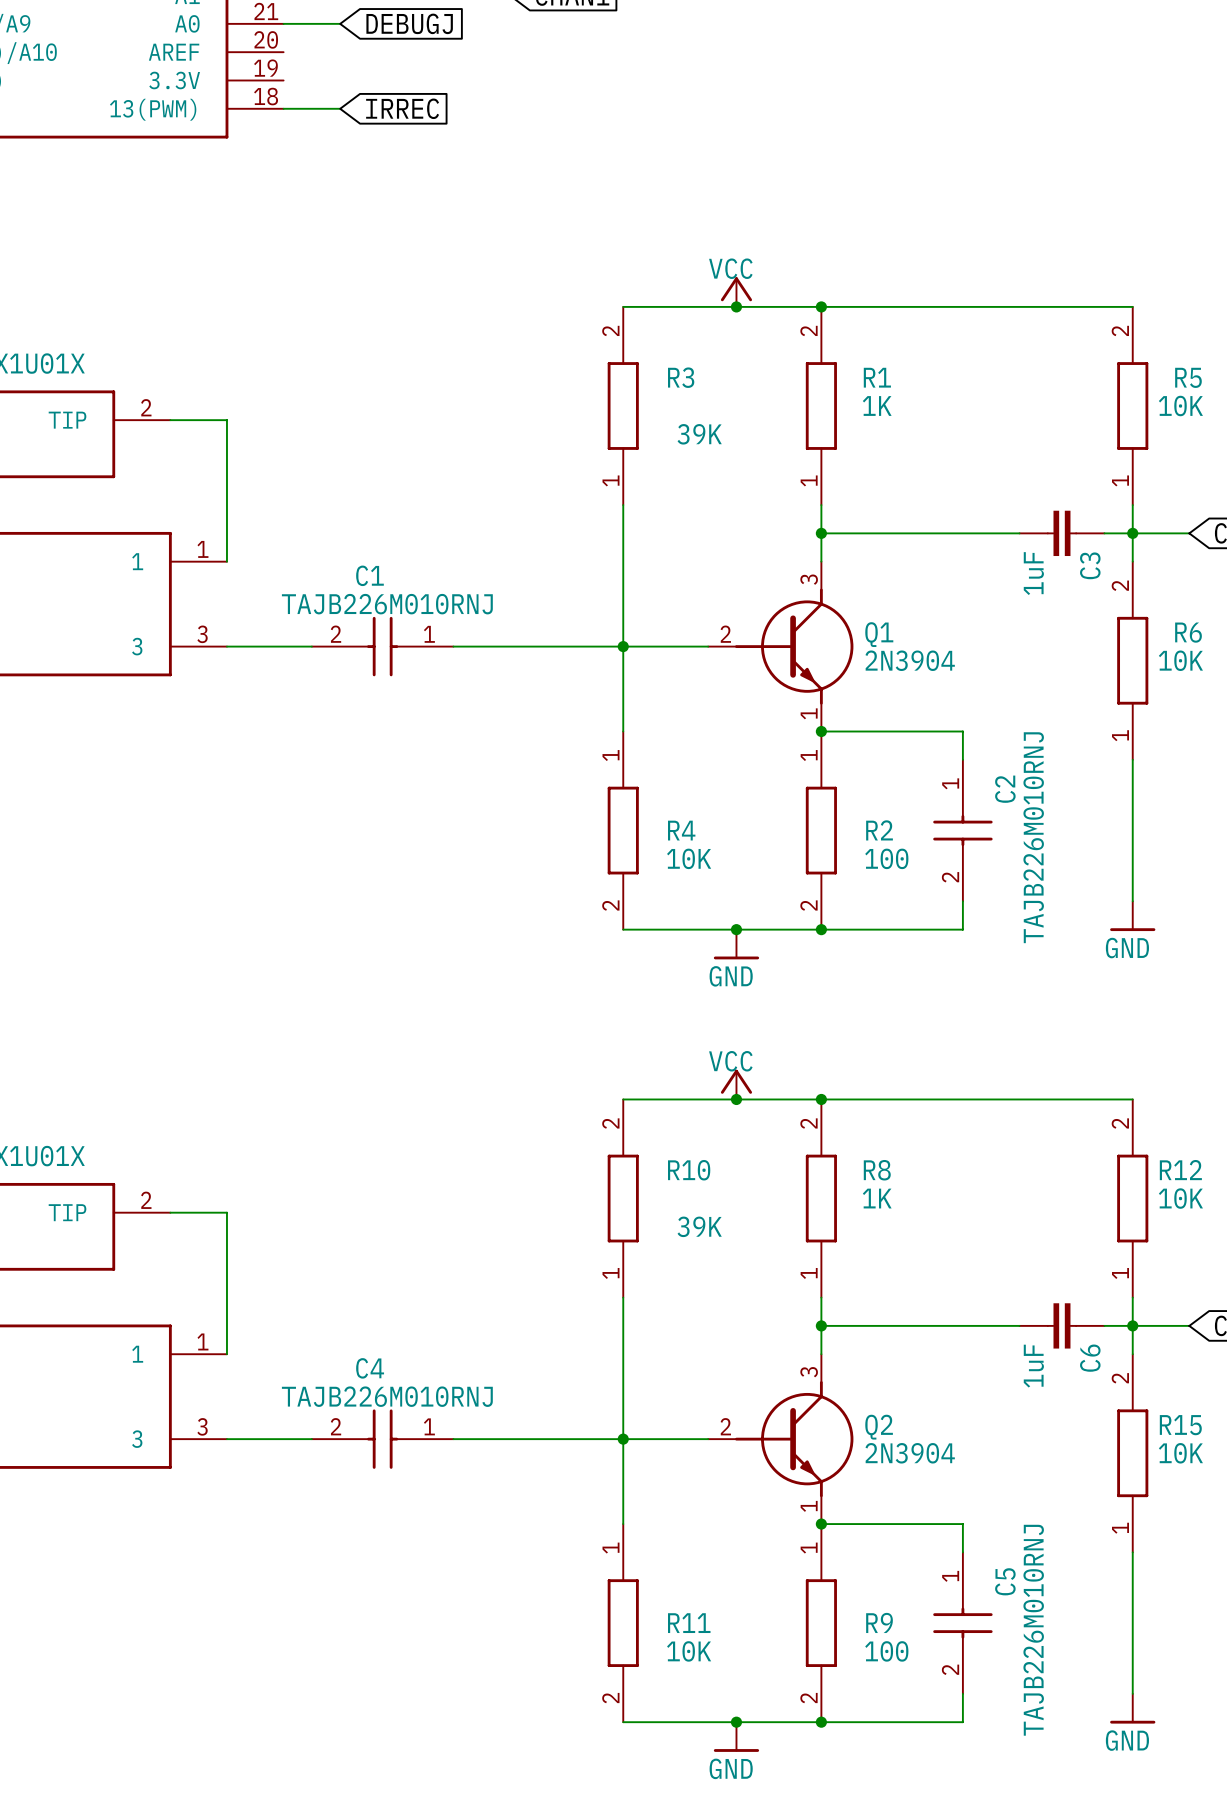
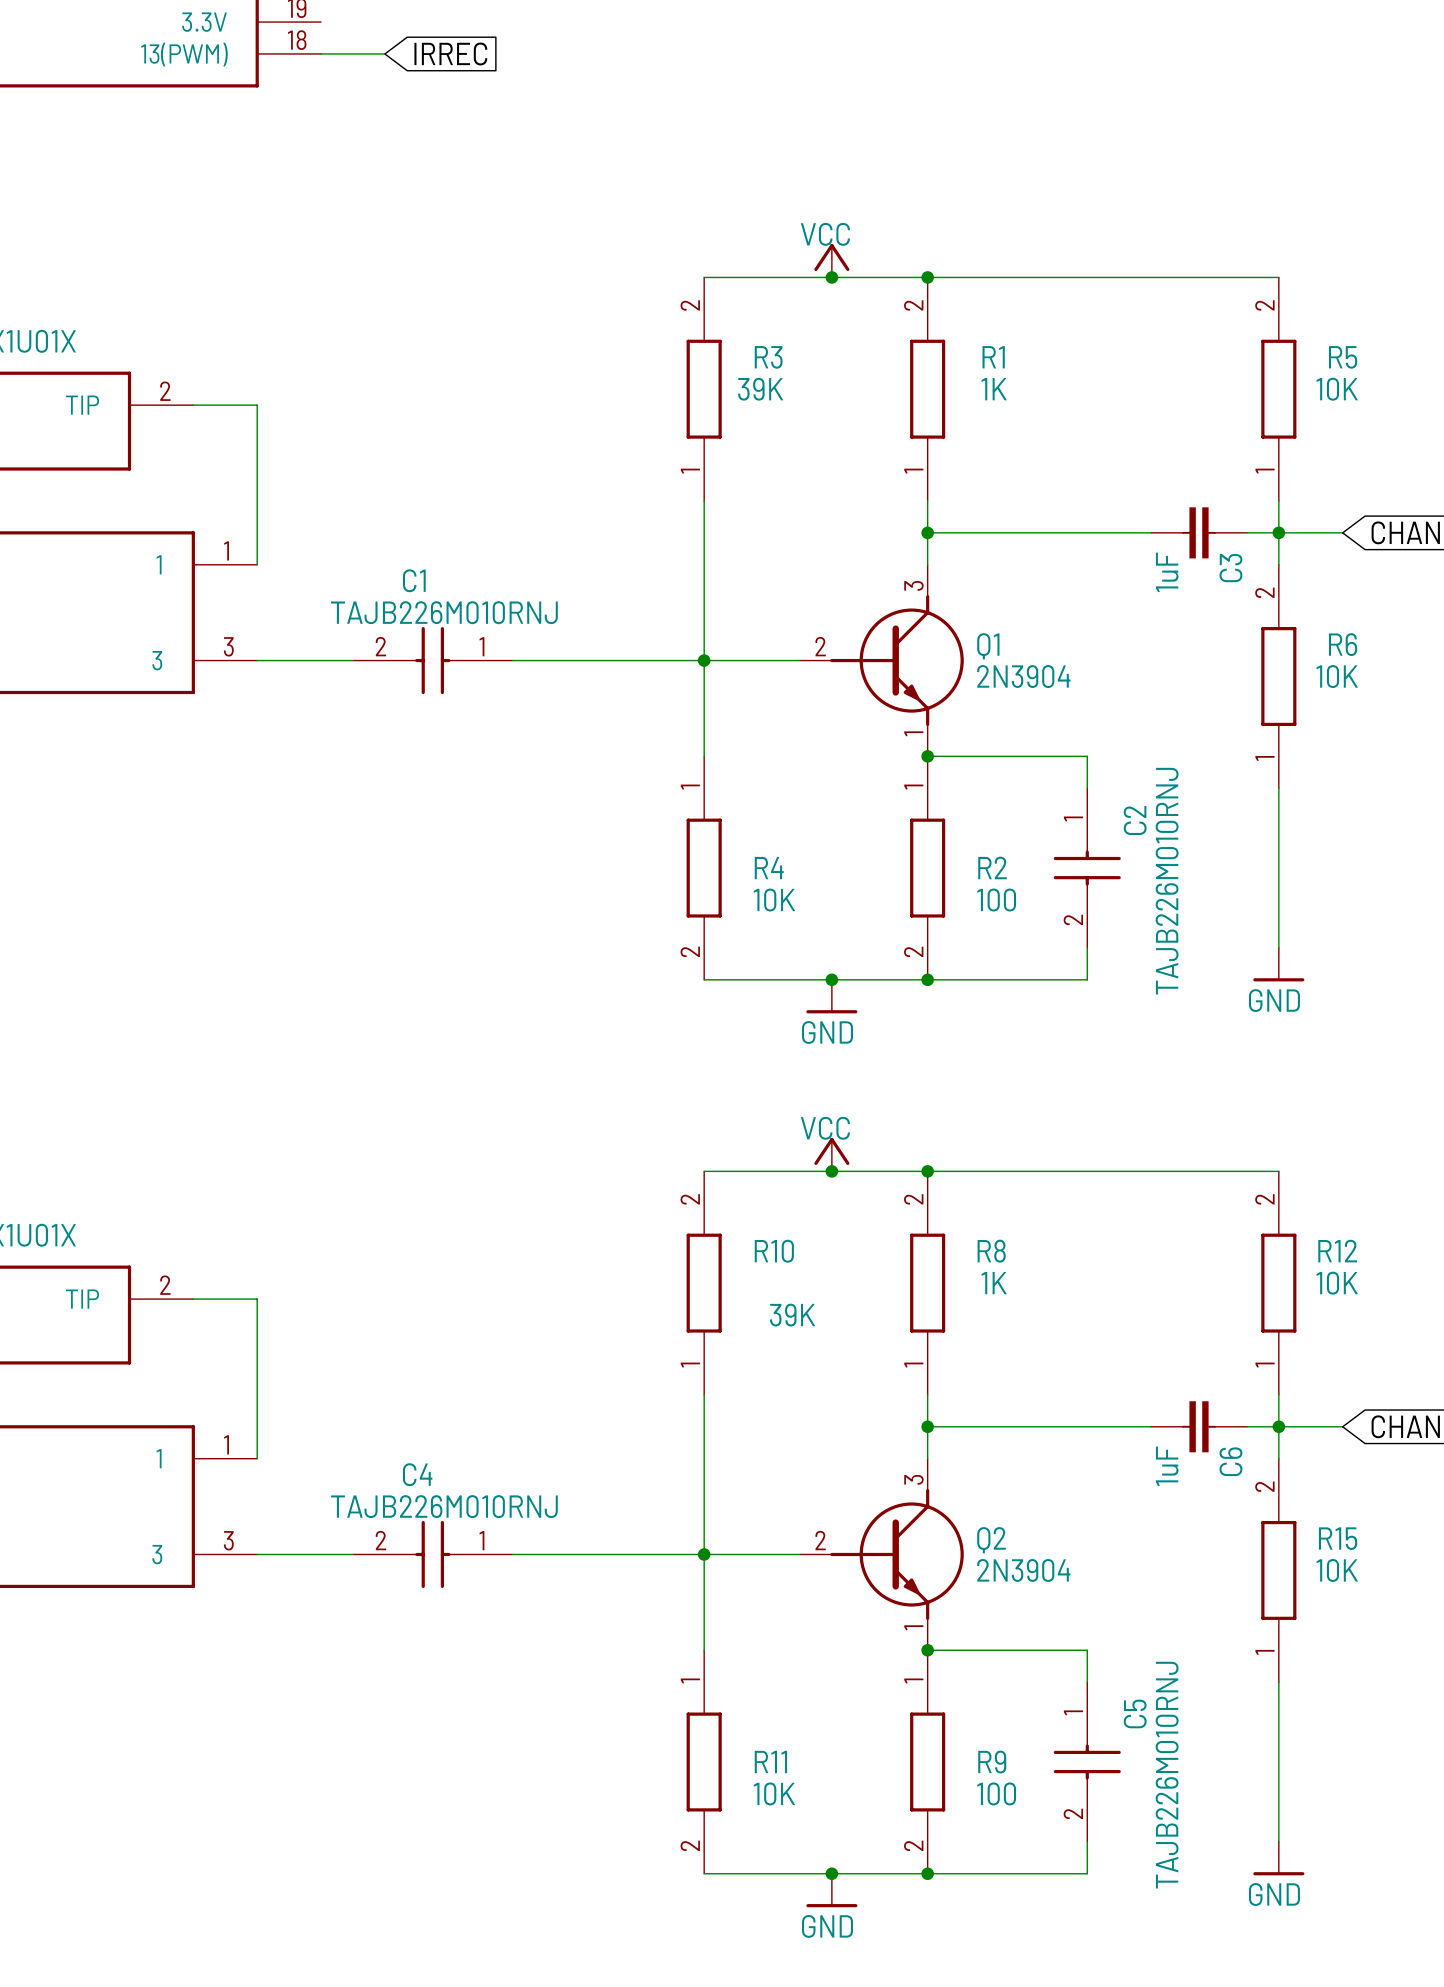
R3 value position: 39K (699, 434) -> 39K (760, 389)

